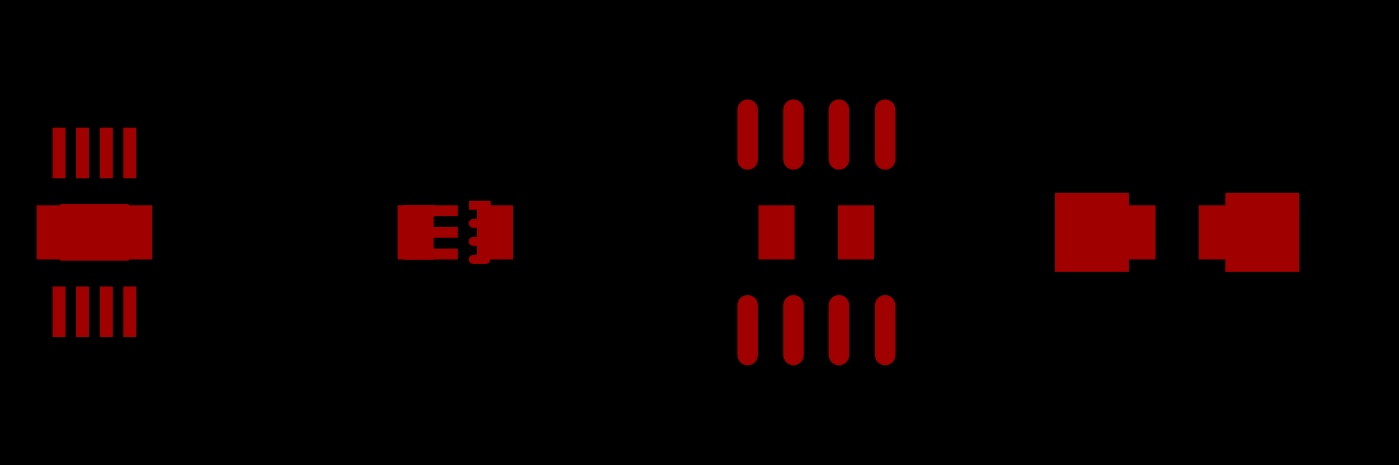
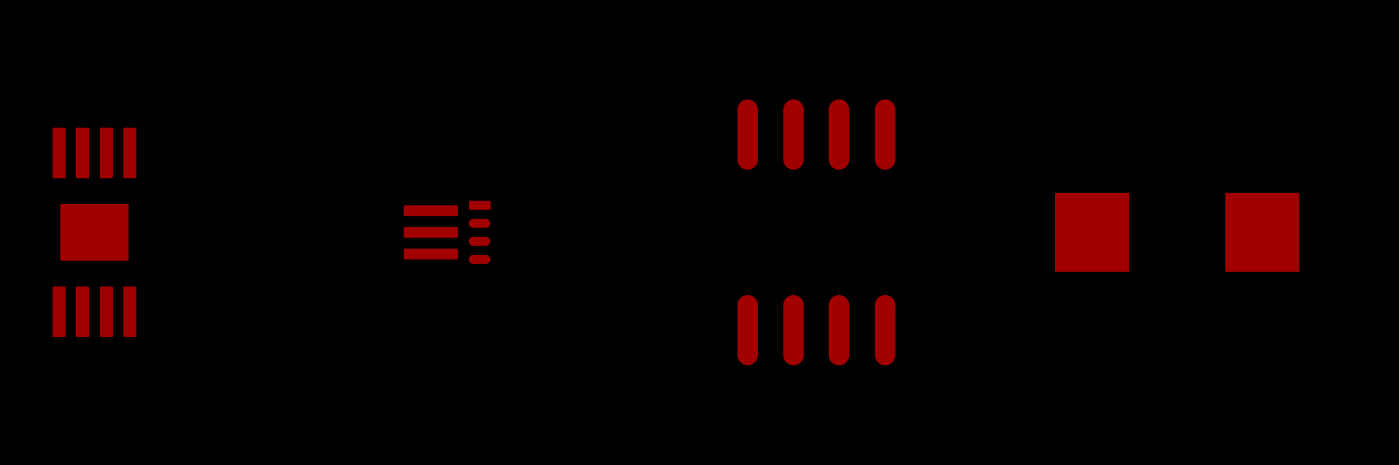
part: (94, 232) -> none
part: (455, 232) -> none
part: (816, 232) -> none
part: (1177, 232) -> none

